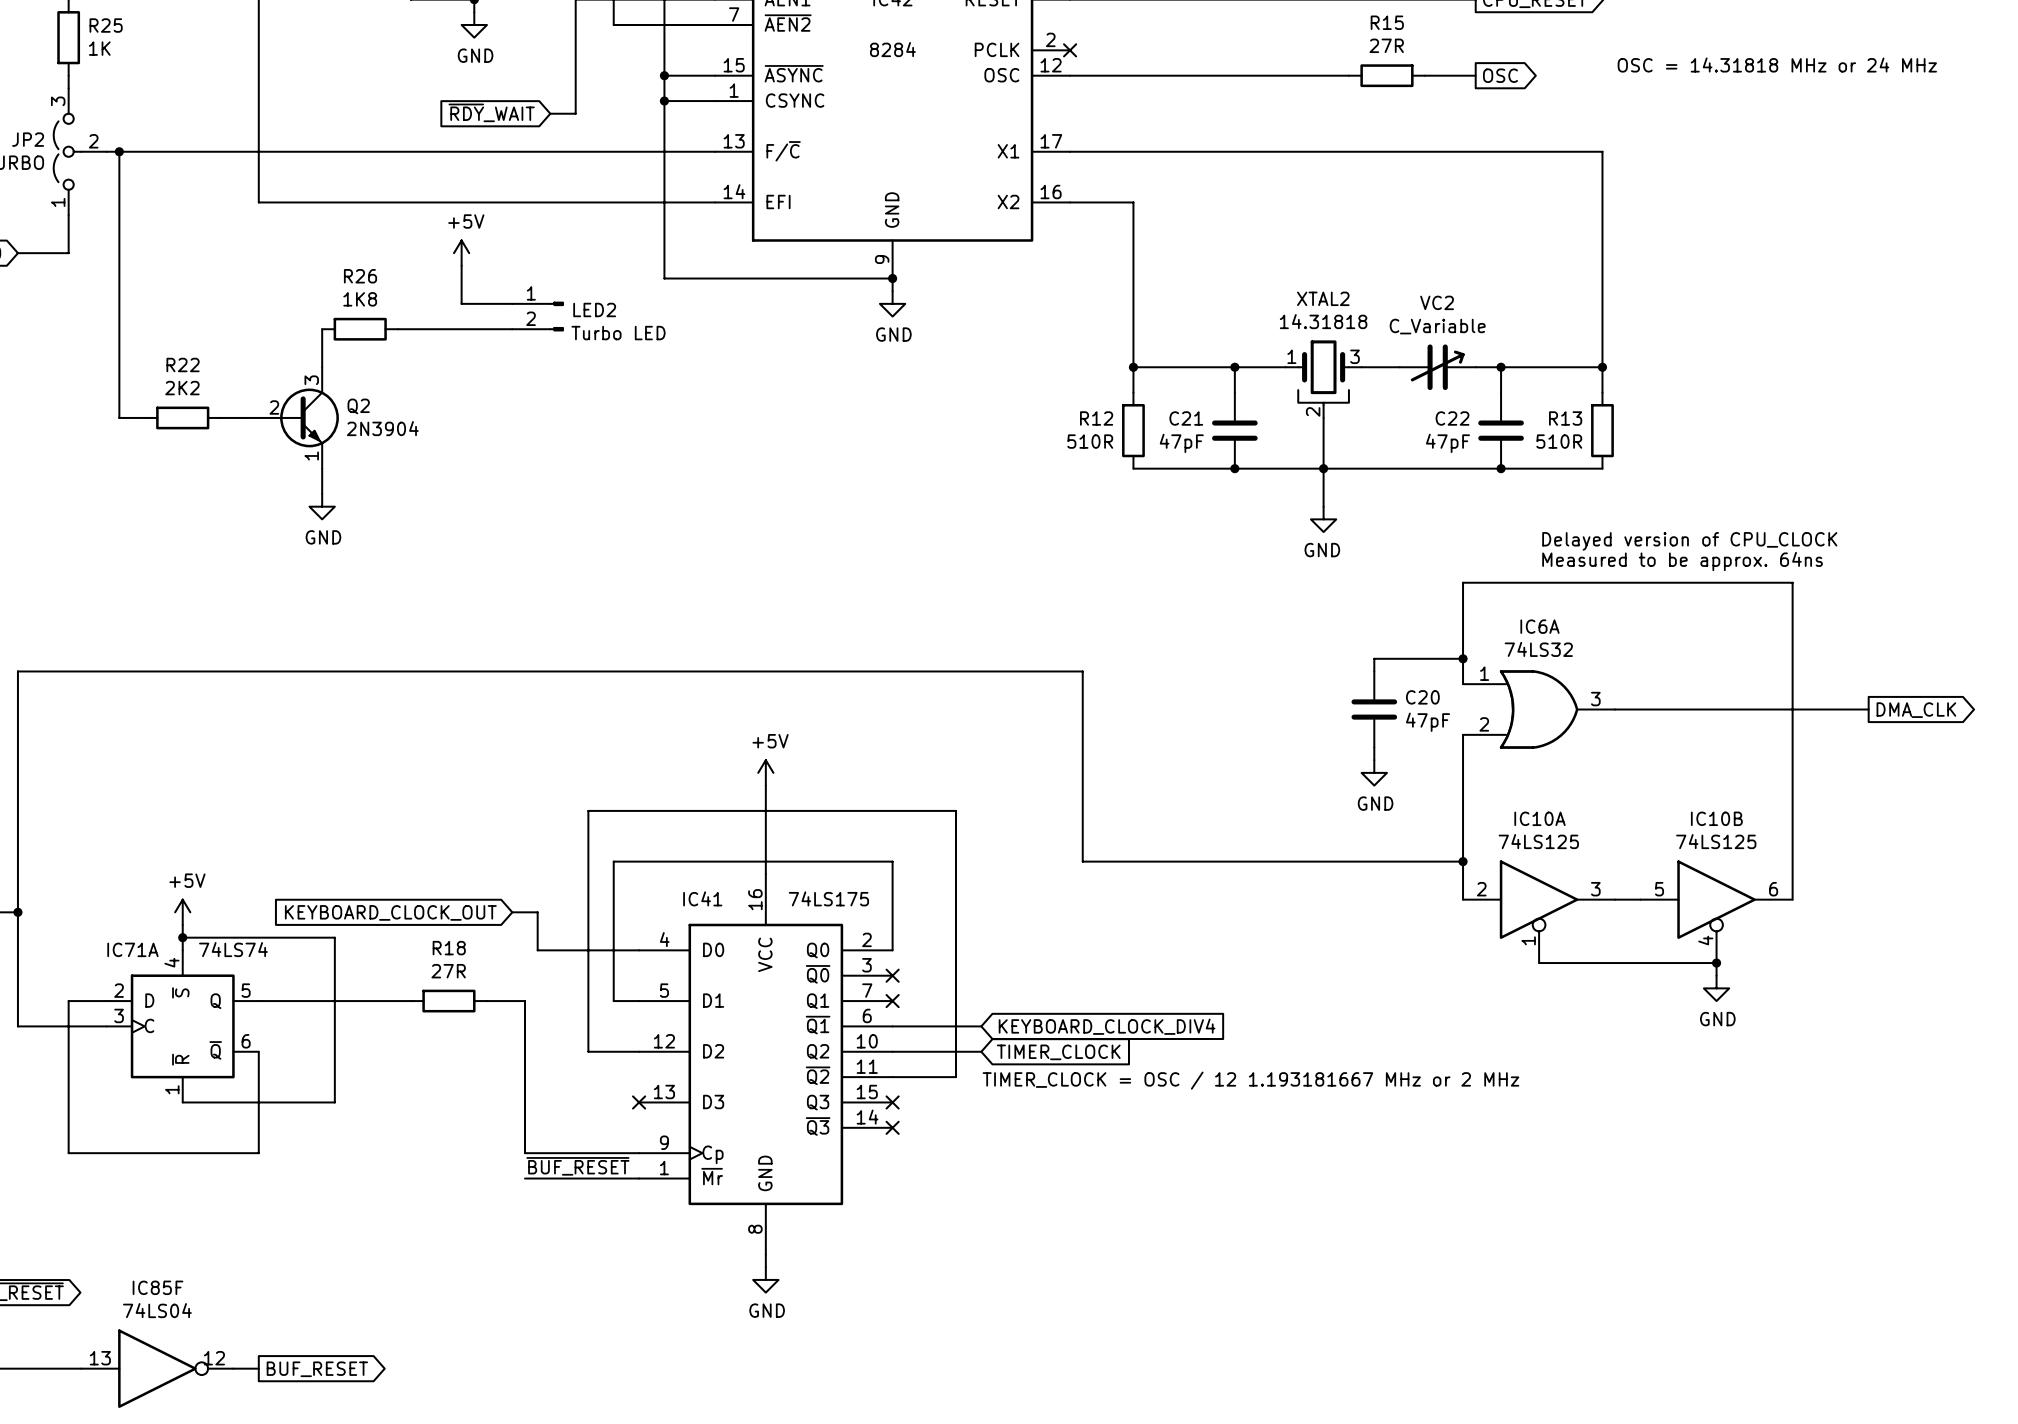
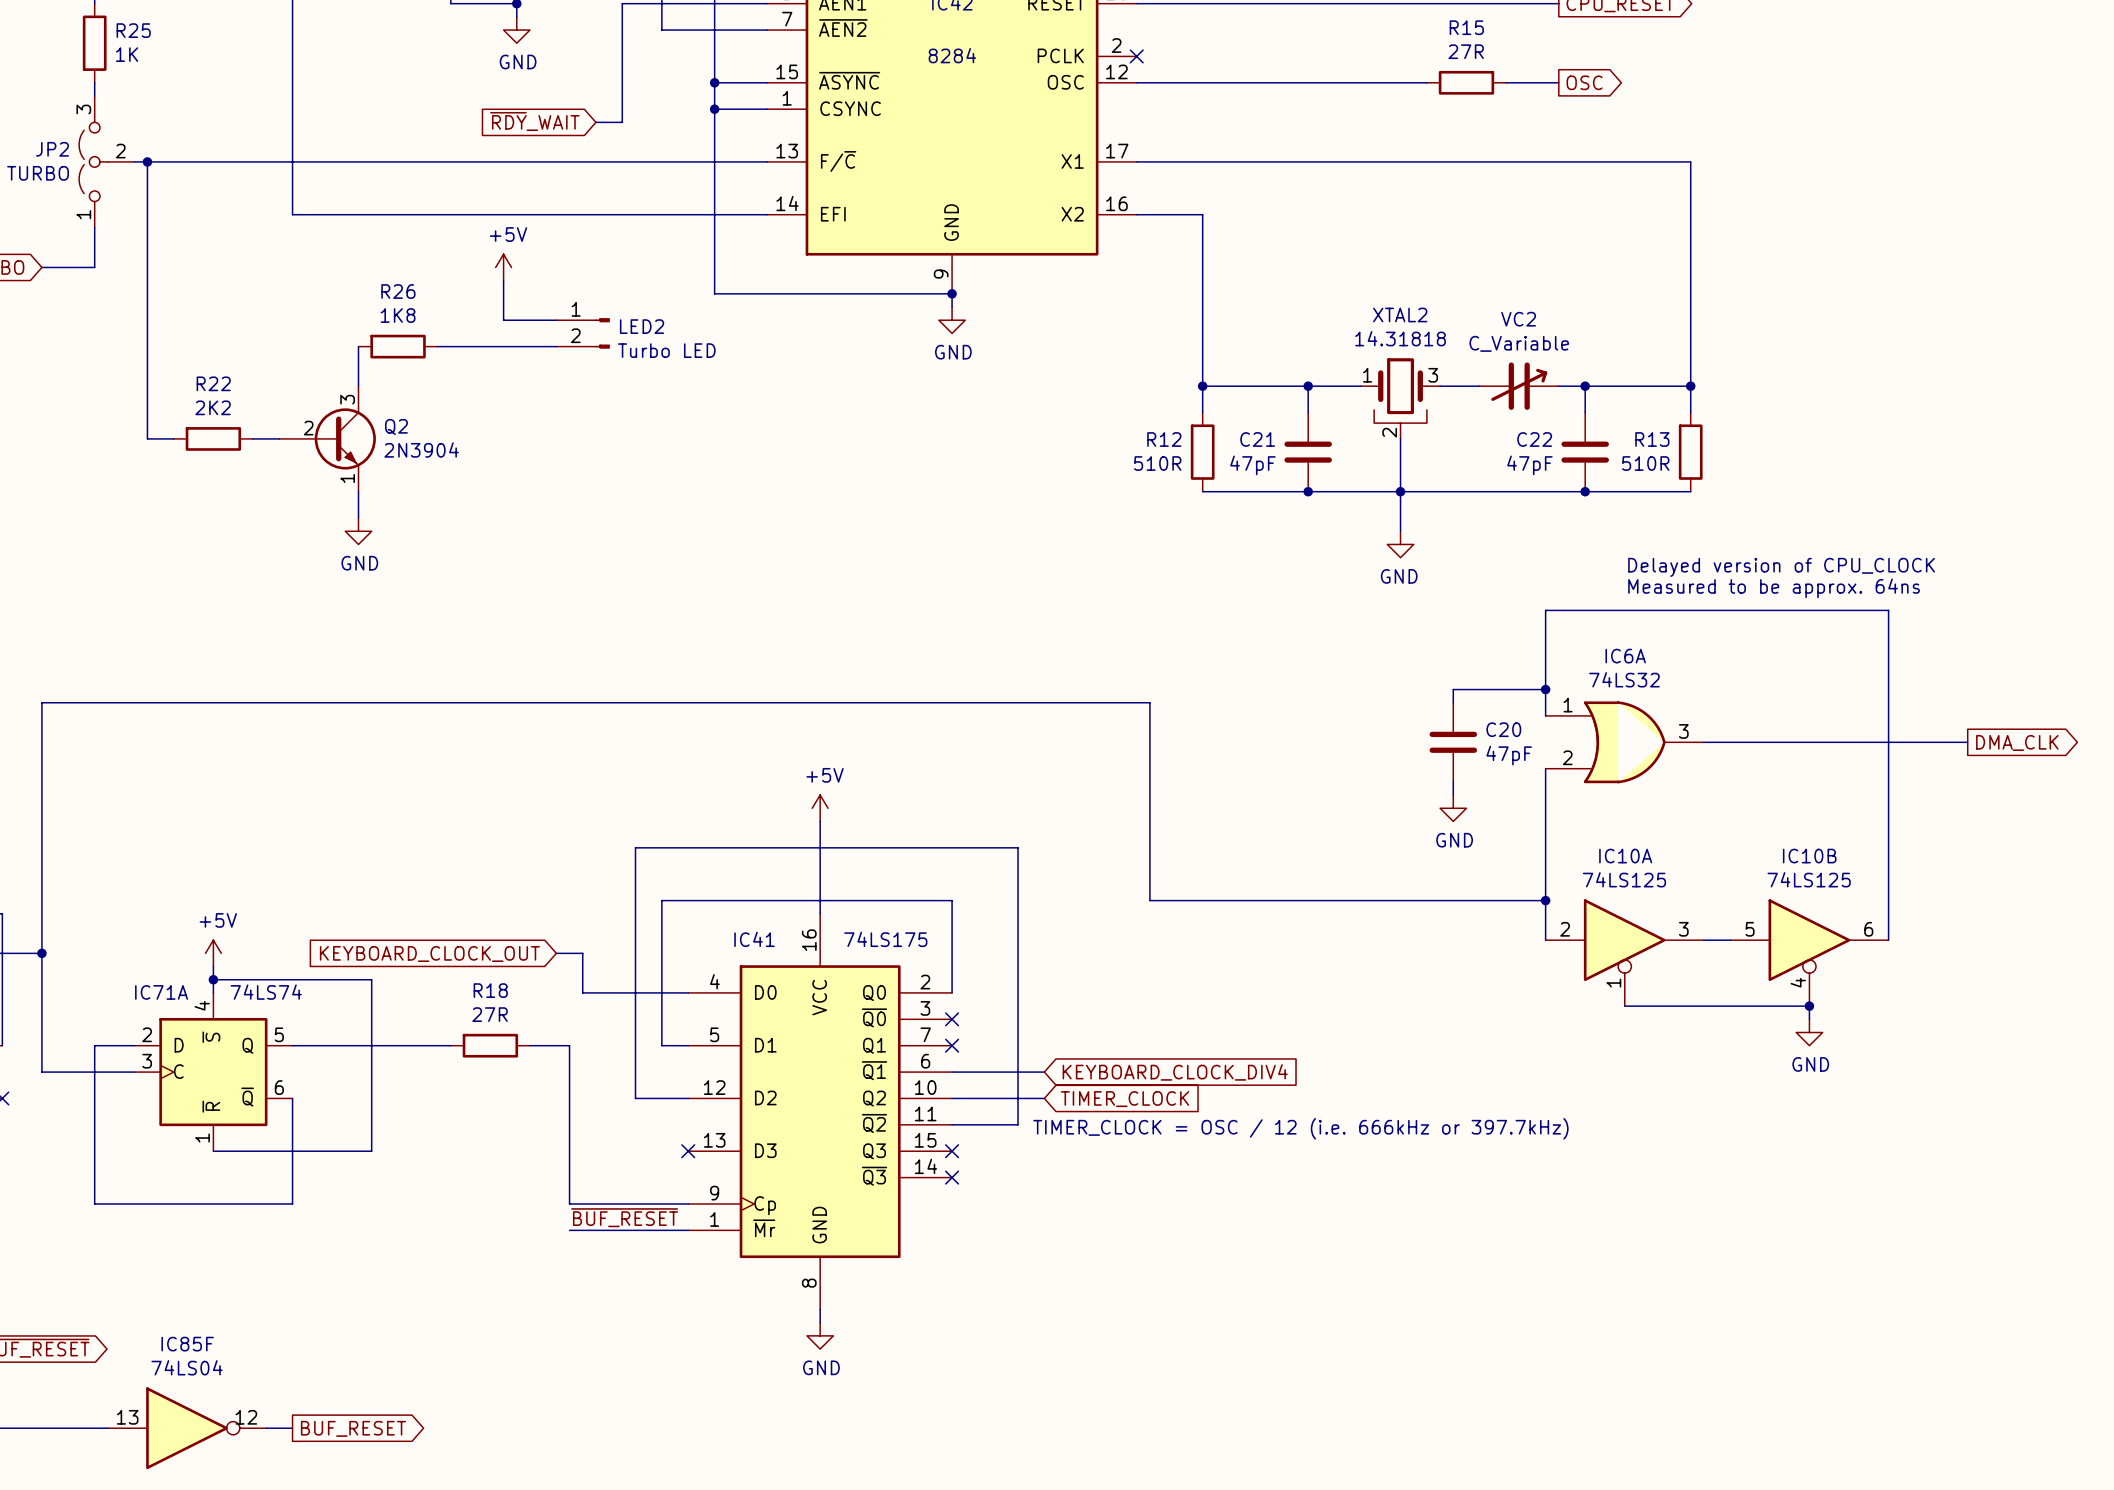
text: OSC = 14.31818 MHz or 24 MHz (1777, 65) -> none
text: none -> TIMER_CLOCK = OSC / 12 (i.e. 666kHz or 397.7kHz) (1300, 1128)
text: TIMER_CLOCK = OSC / 12 1.193181667 MHz or 2 MHz (1250, 1080) -> none

